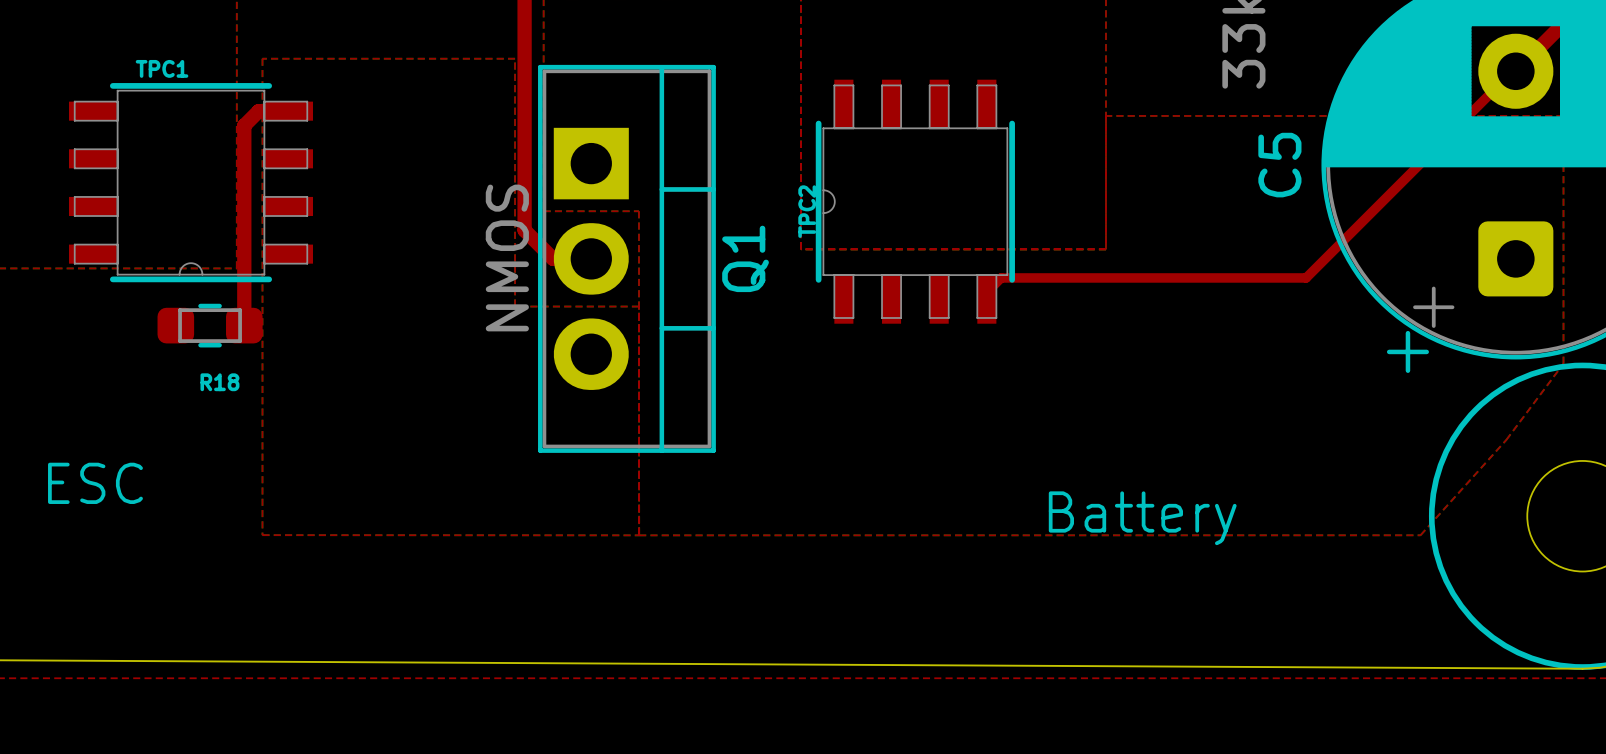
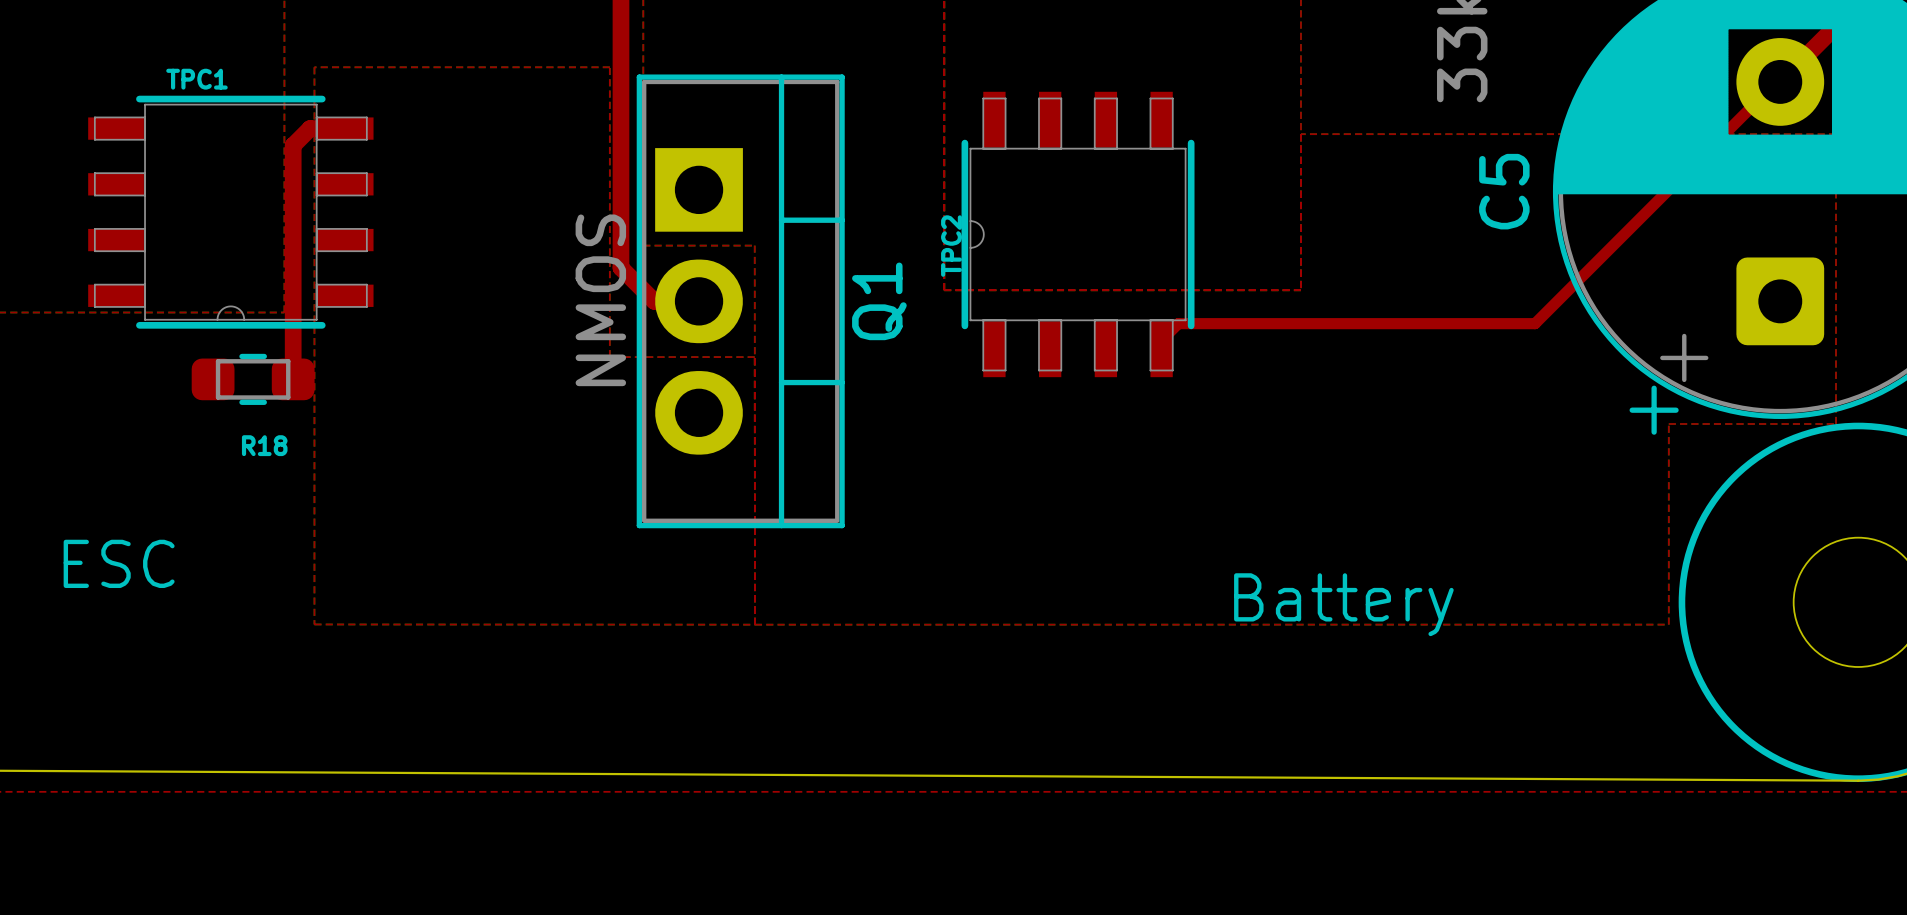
top zone outline: (1563, 363) (1506, 439) (1420, 535) -> (1836, 423) (1668, 423) (1668, 624)

